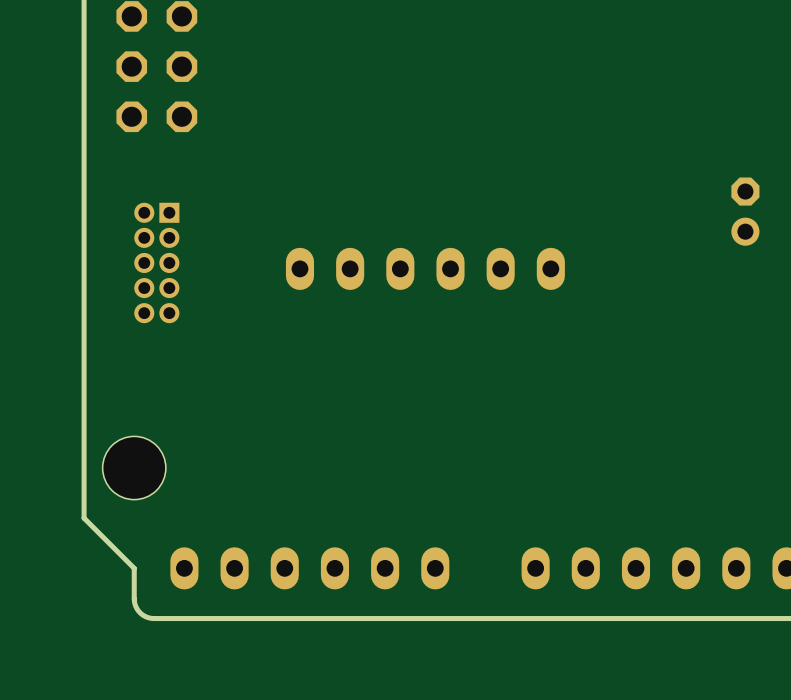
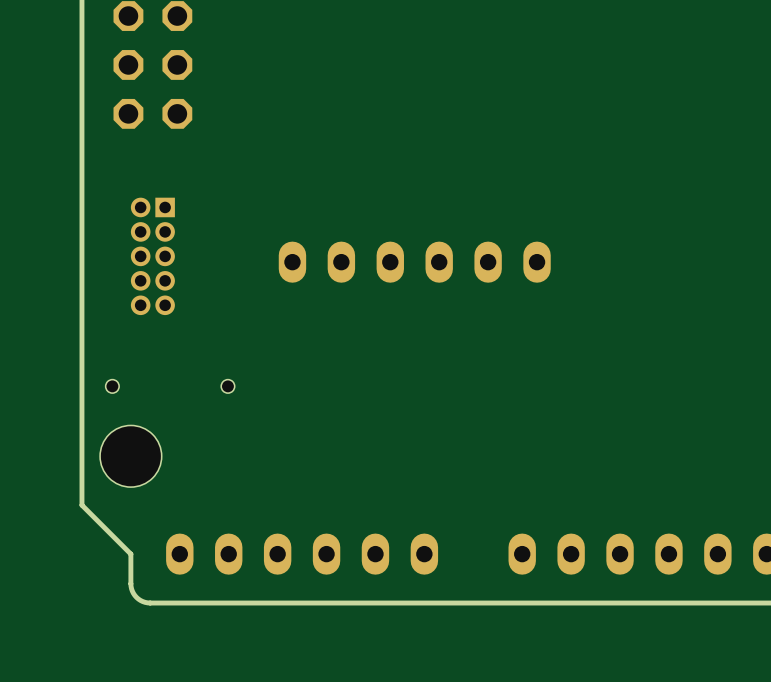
part: (745, 211) -> none
hole: none -> (112, 386)
hole: none -> (227, 386)

